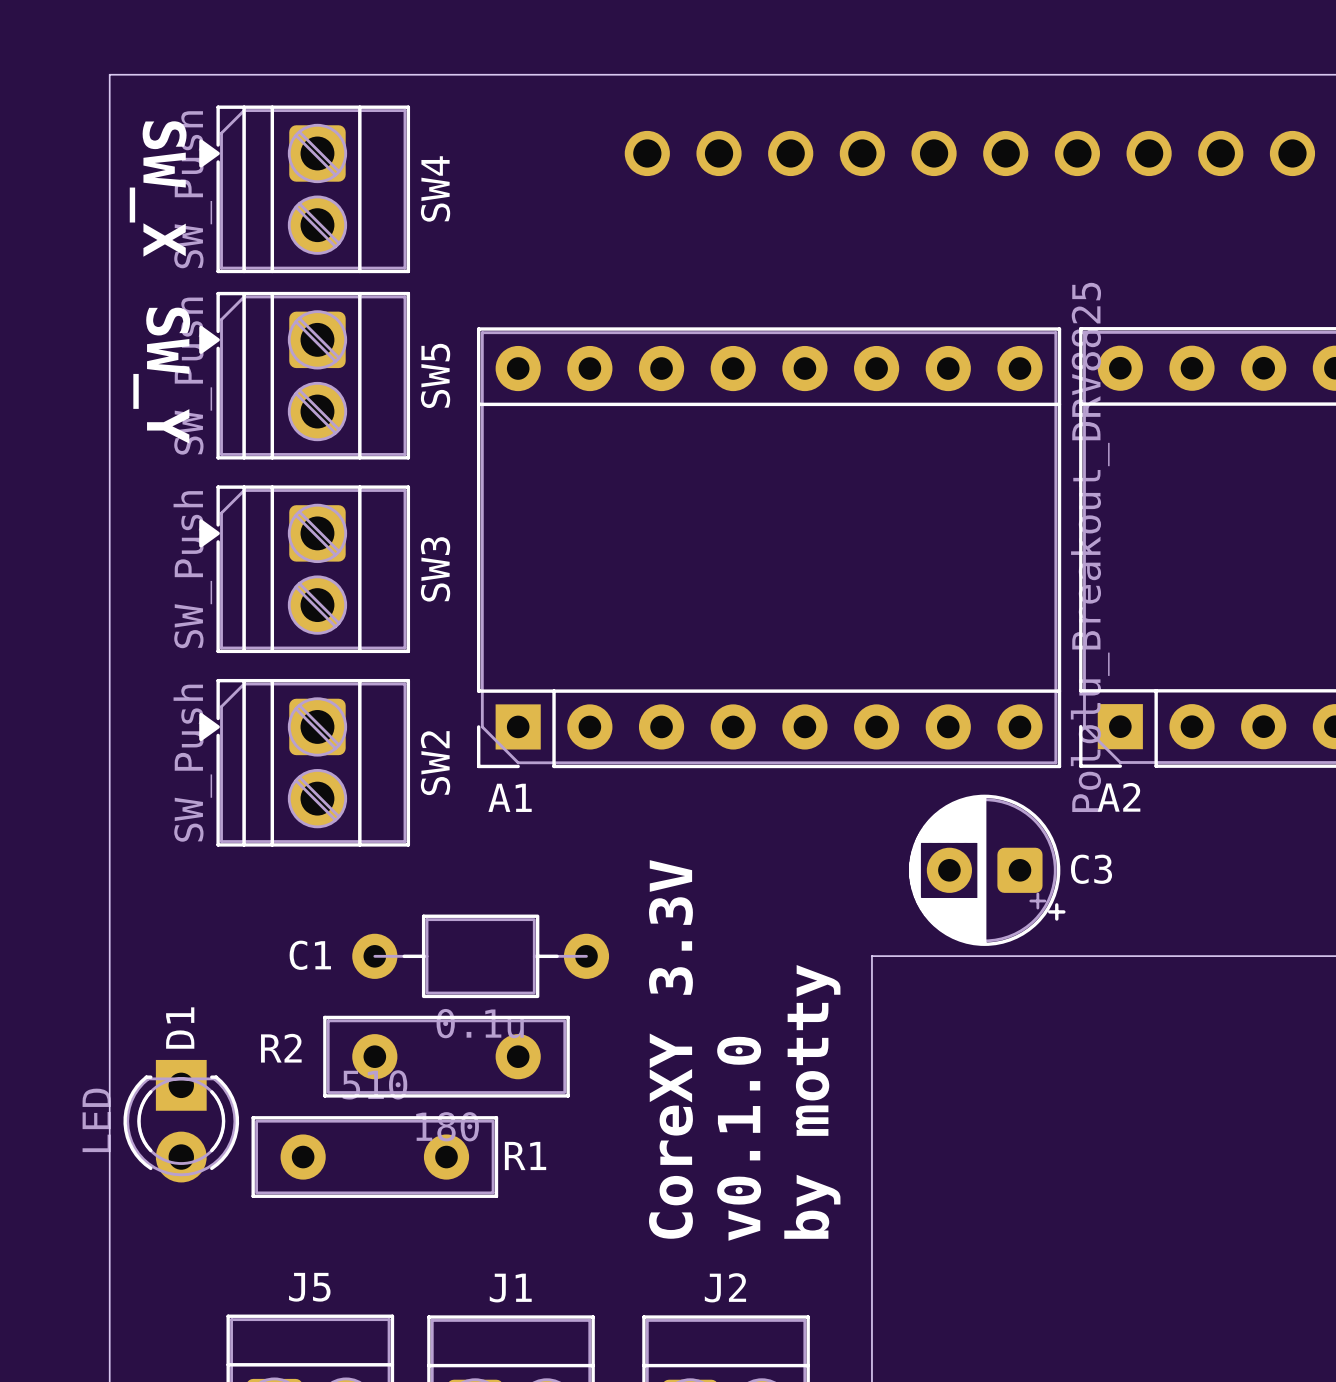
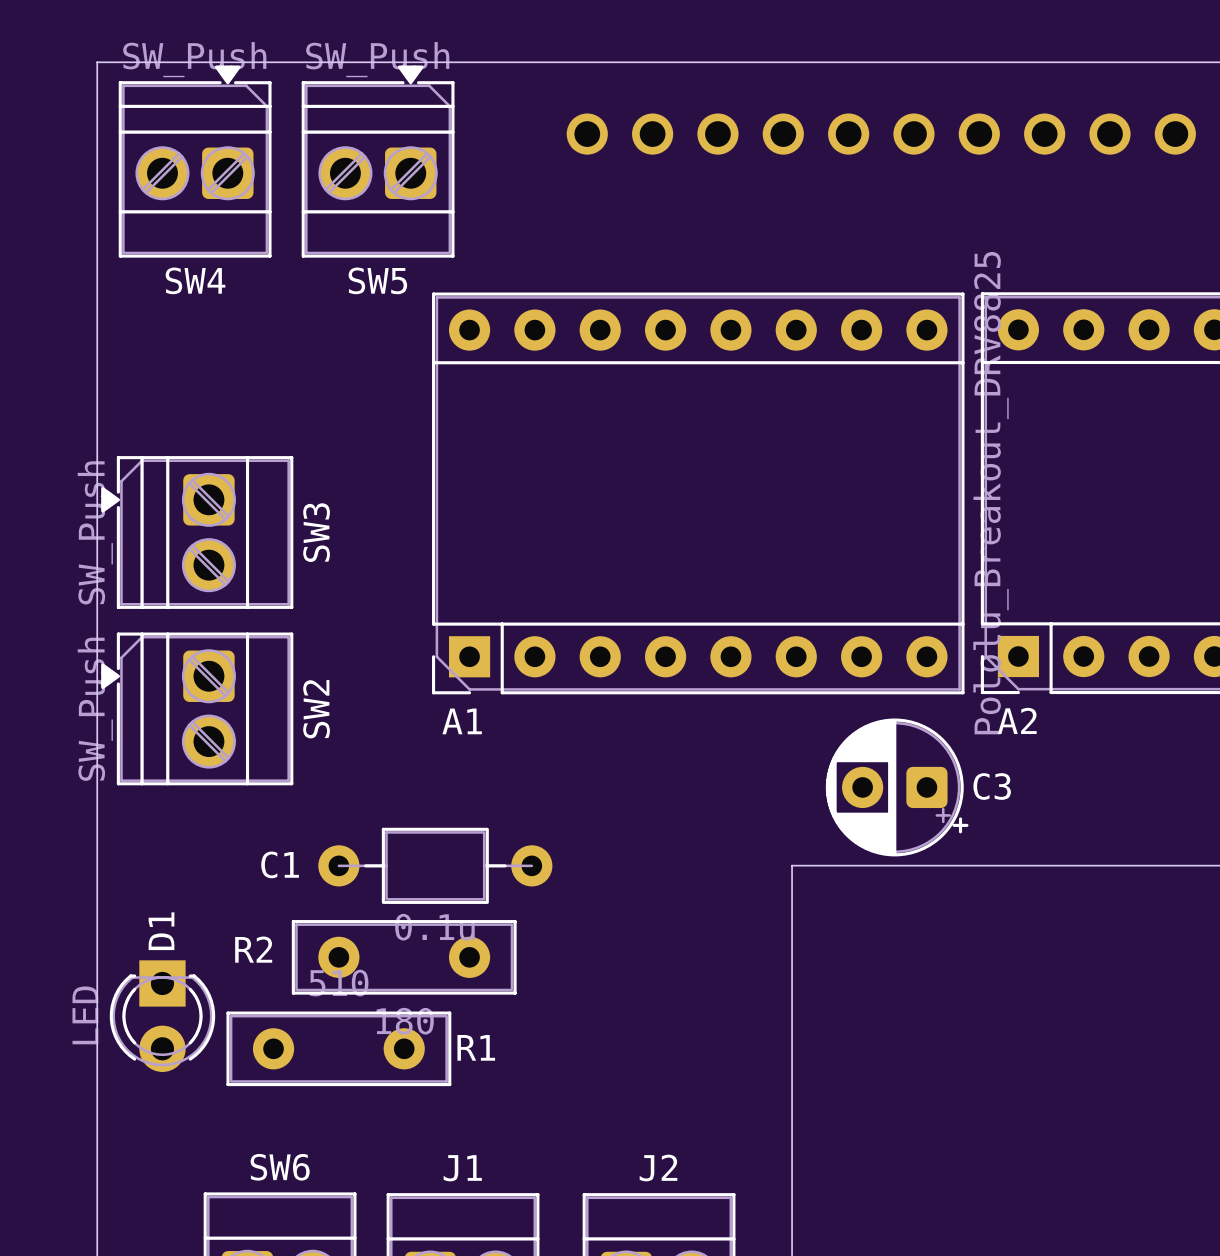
text: SW_X (158, 189) -> none
SW4 rotation: 0° (304, 189) -> 90° clockwise (195, 161)
text: SW_Y (161, 375) -> none
SW5 rotation: 0° (304, 375) -> 90° clockwise (378, 161)
SW5 position: (304, 375) -> (378, 161)
SW3 position: (304, 569) -> (197, 532)
SW2 position: (304, 762) -> (197, 708)
text: CoreXY 3.3V (670, 1049) -> none
text: by motty (812, 1101) -> none
text: v0.1.0 (739, 1138) -> none
J5 name: J5 (309, 1287) -> SW6 (280, 1167)

